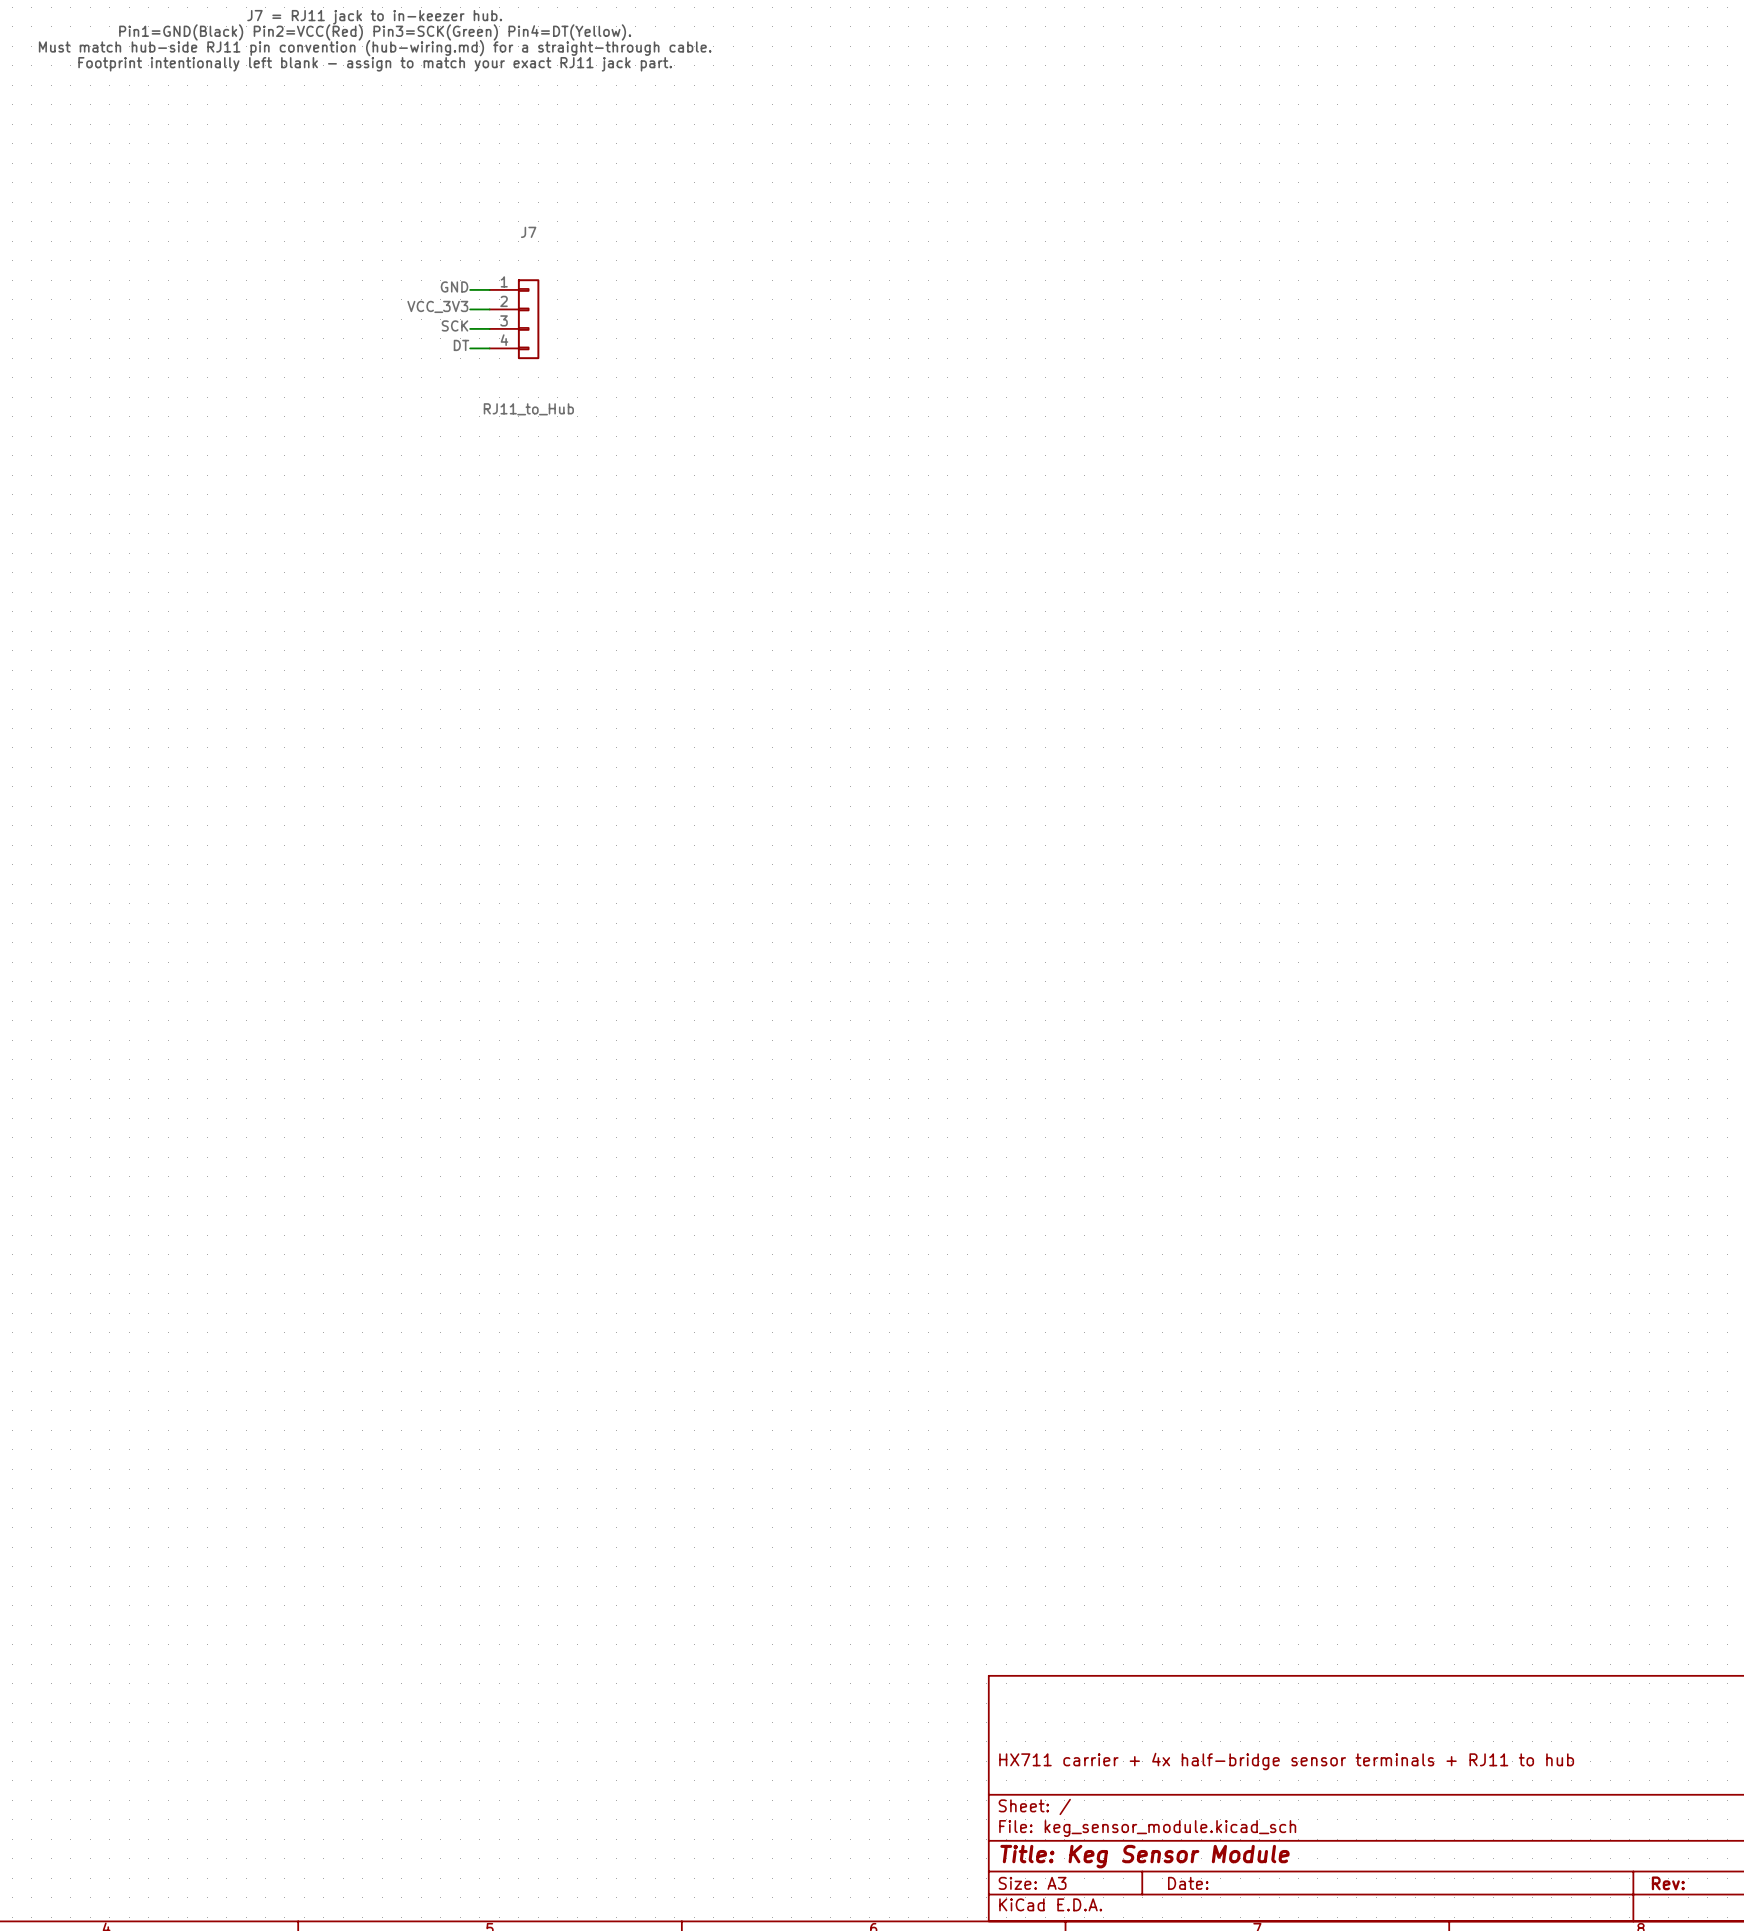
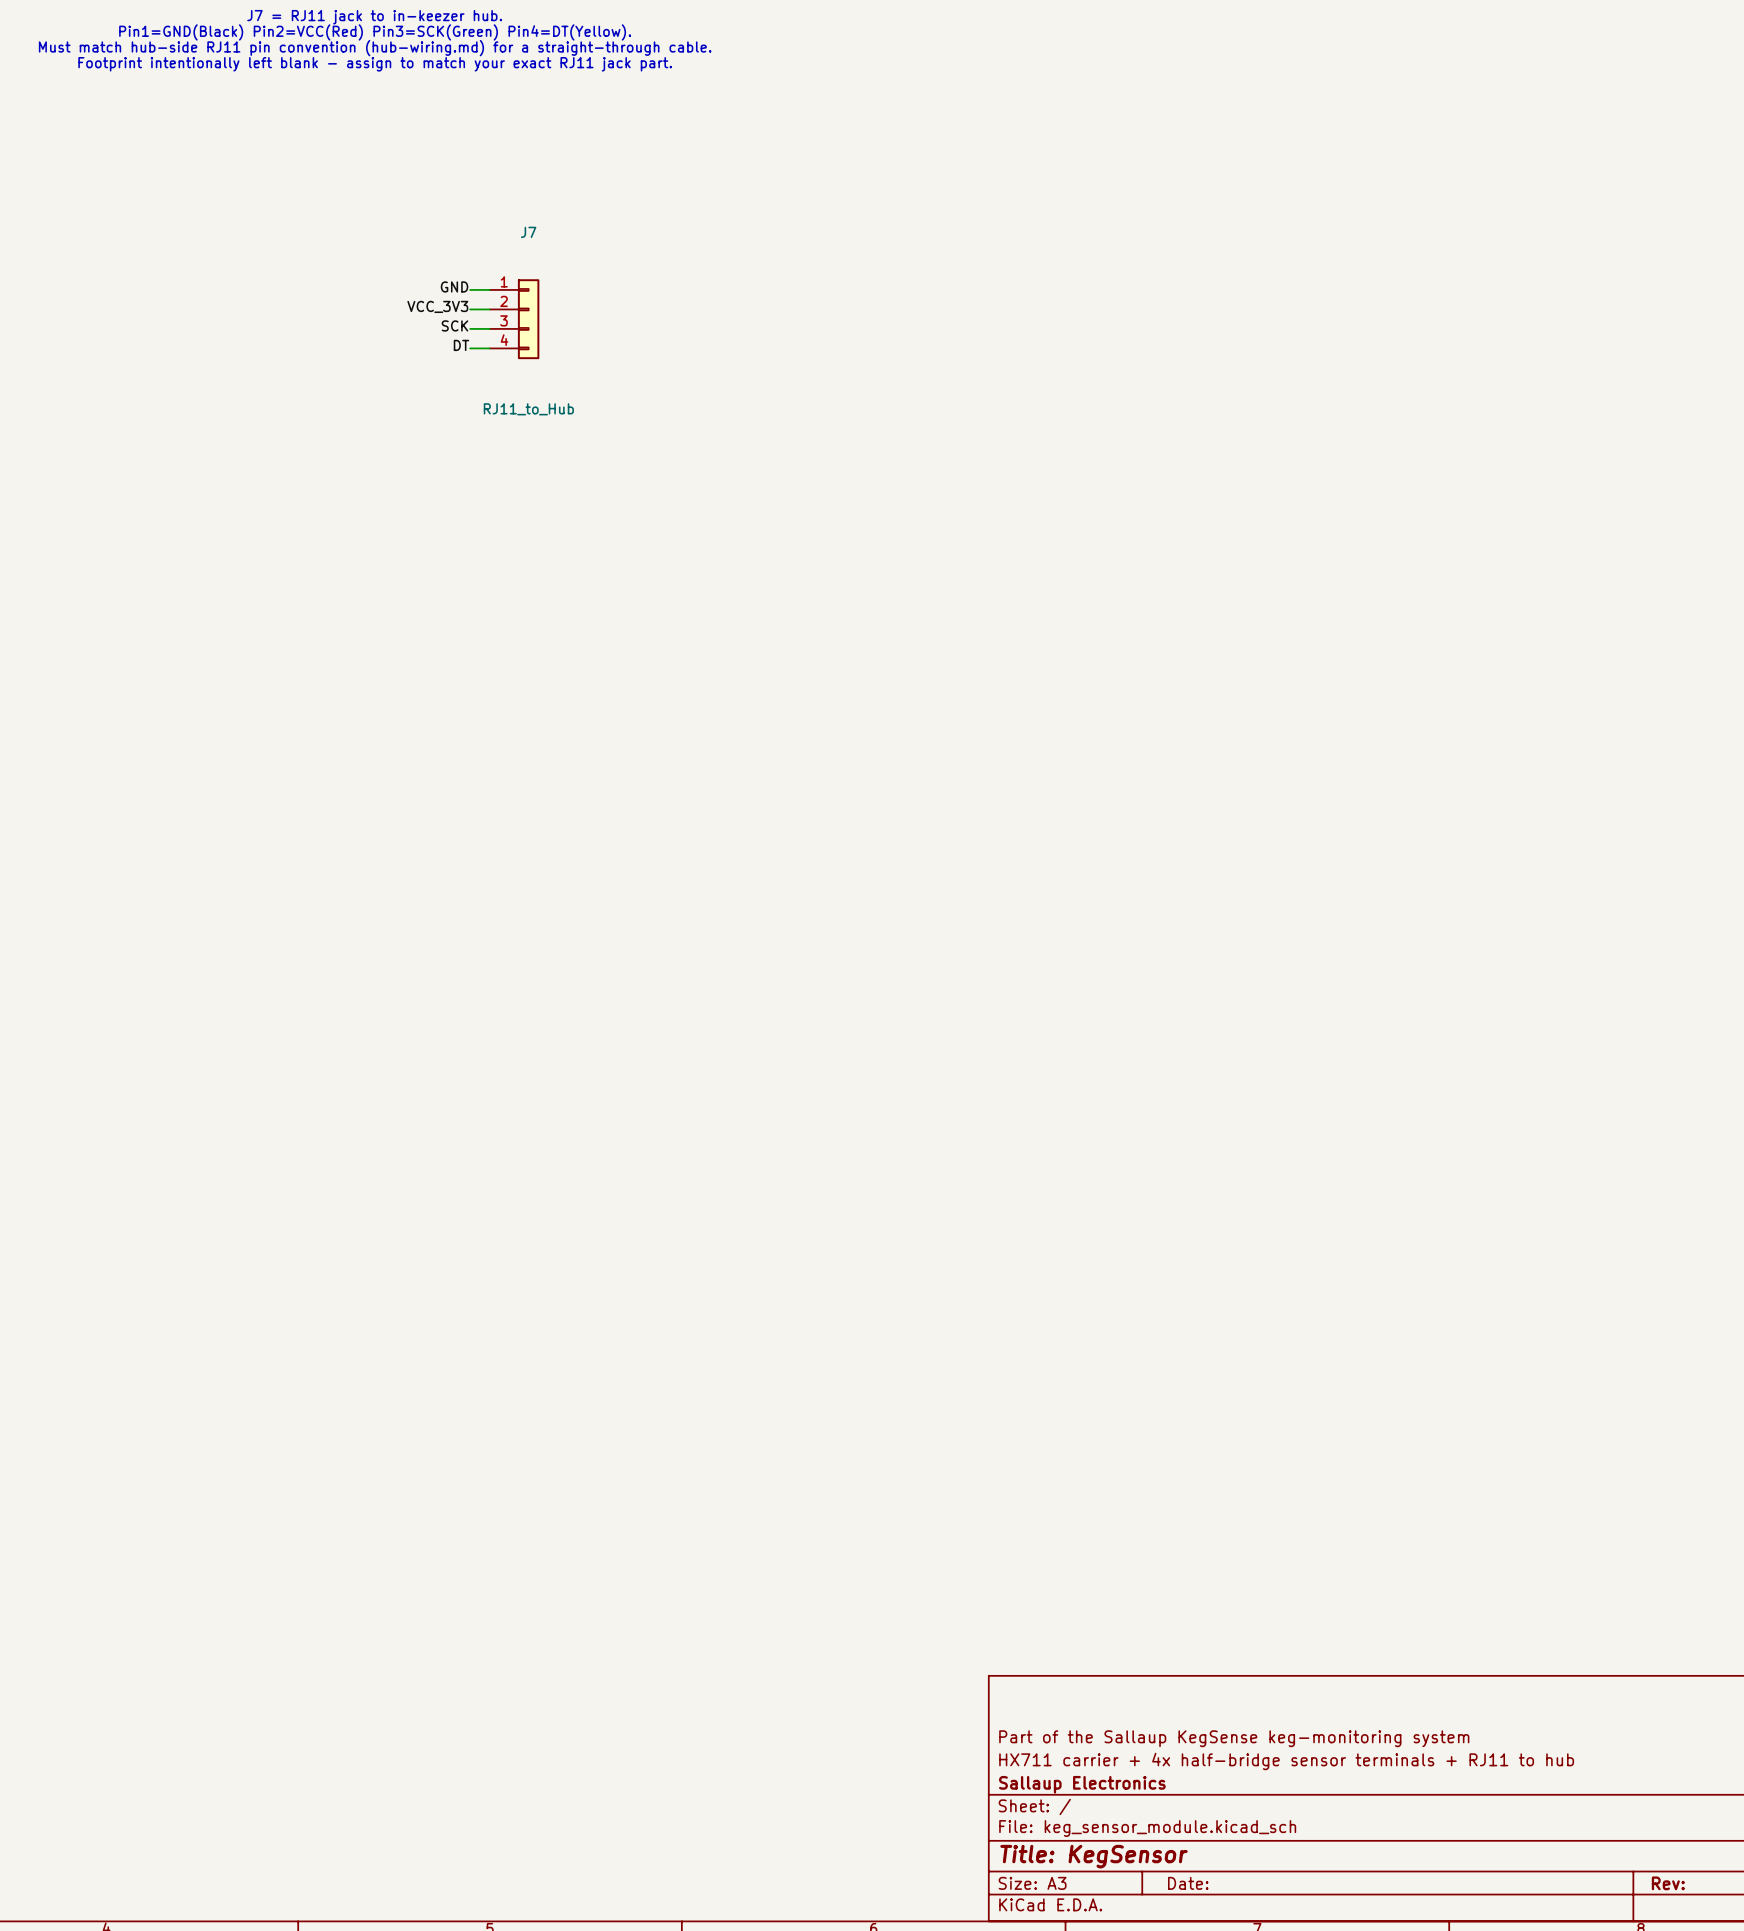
title block: none -> Part of the Sallaup KegSense keg-monitoring system (1234, 1738)
title block: none -> Sallaup Electronics (1082, 1784)
title block: Title: Keg Sensor Module (1145, 1856) -> Title: KegSensor (1093, 1856)

